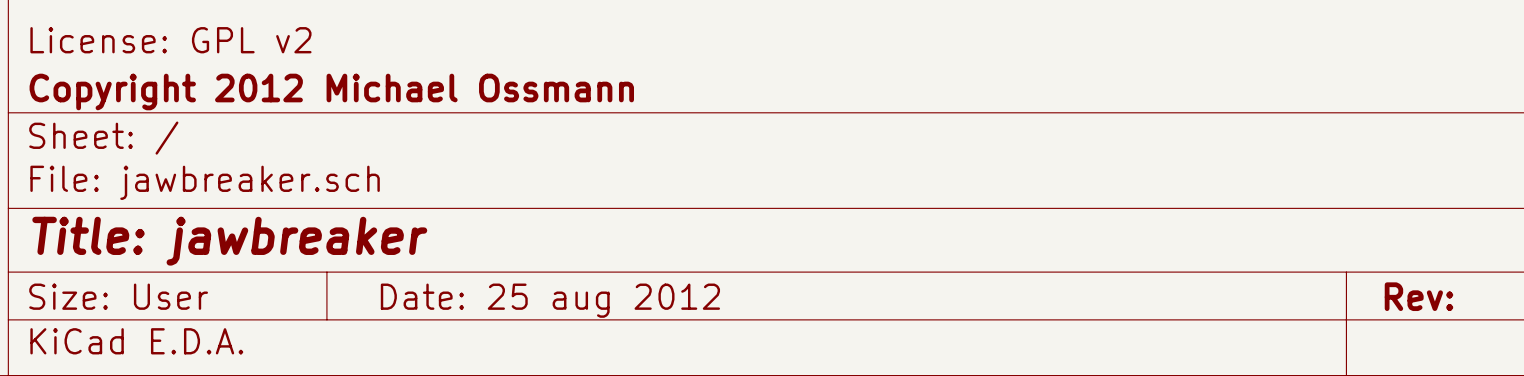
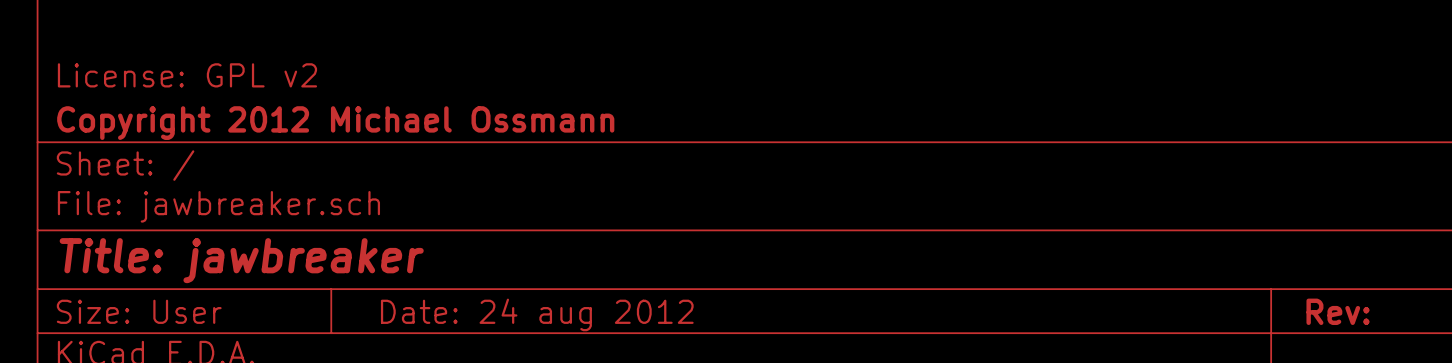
title block: Date: 25 aug 2012 (550, 300) -> Date: 24 aug 2012 (537, 314)

